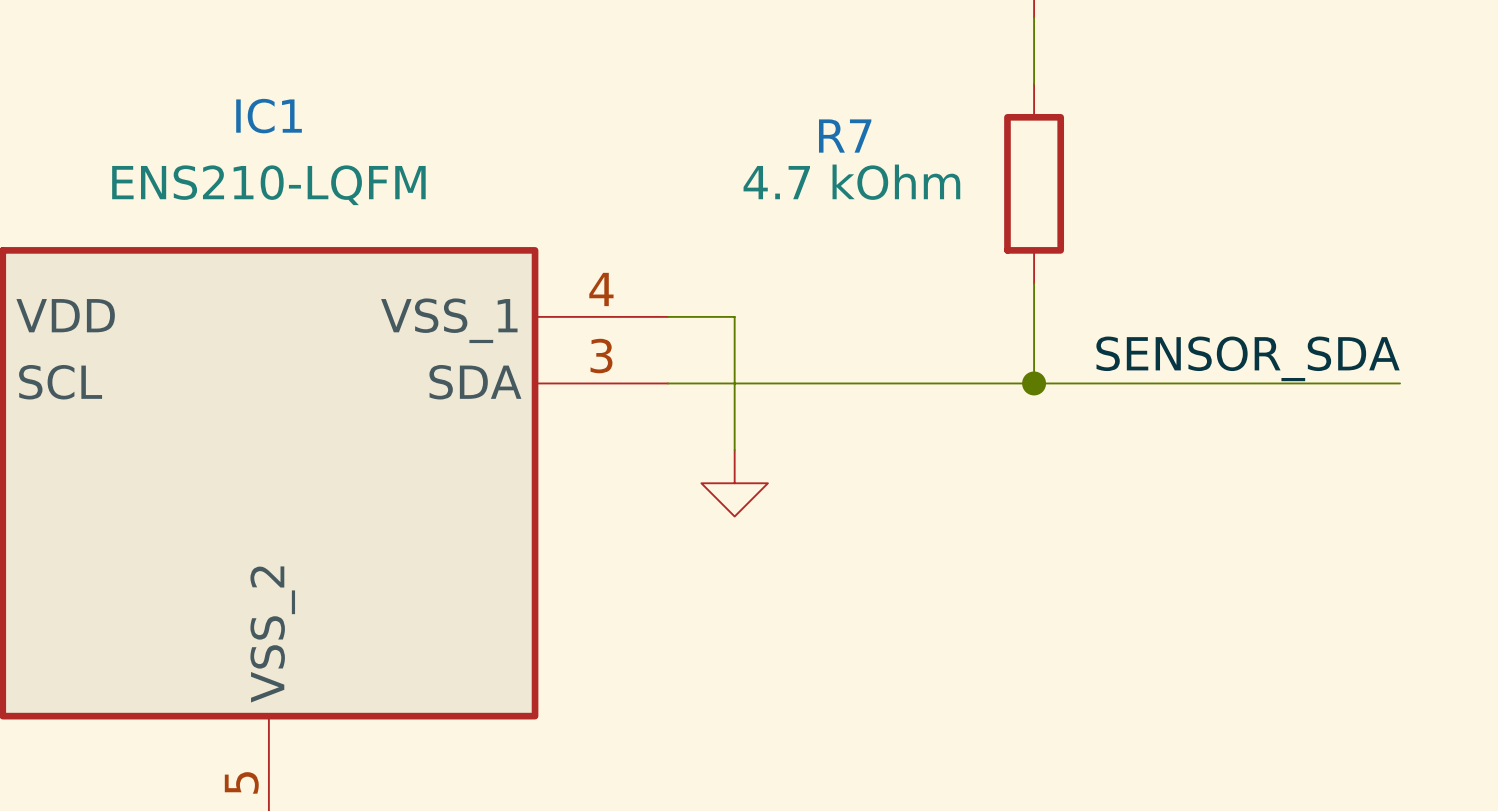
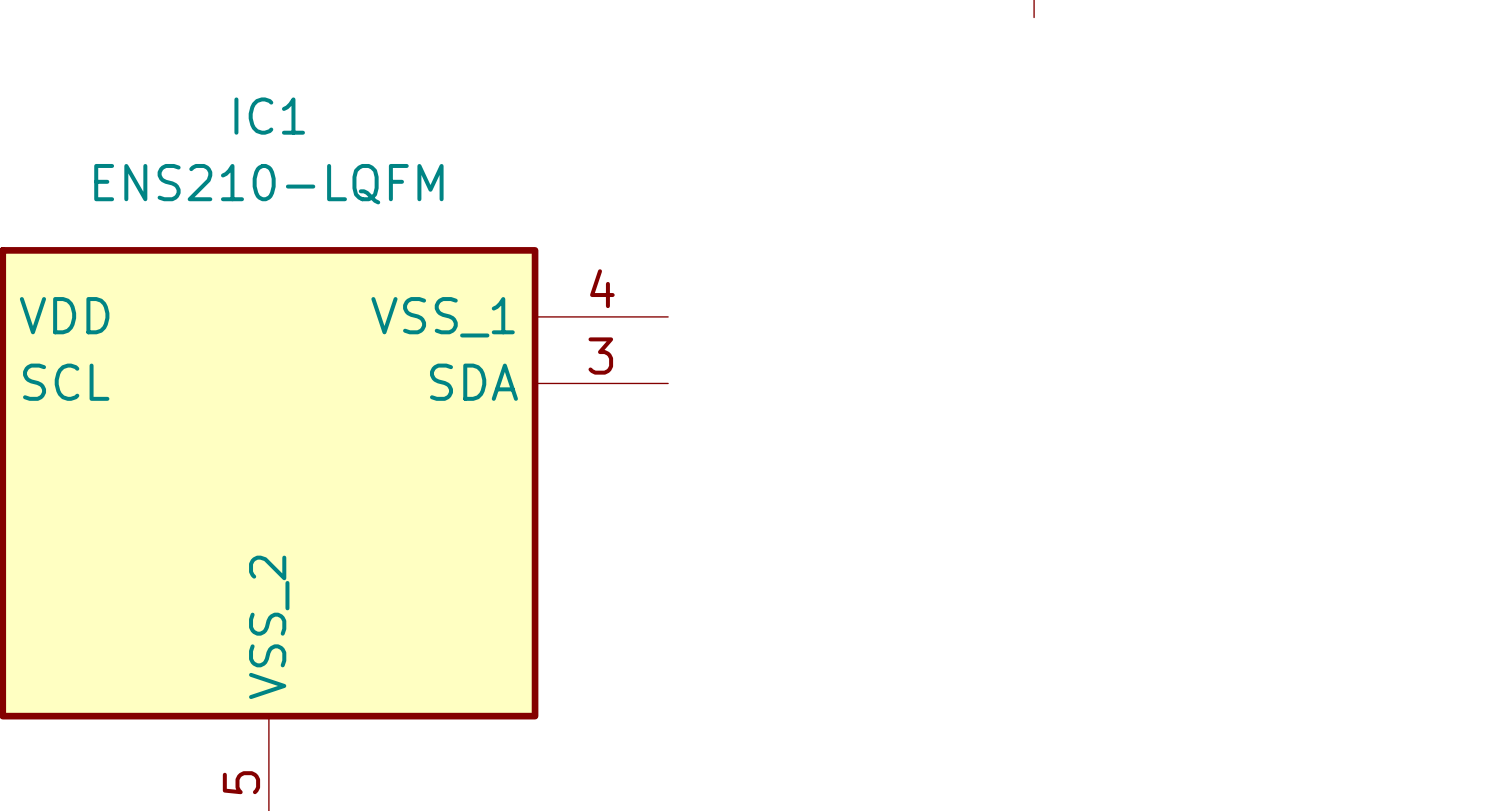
wire: (1034, 17) (1034, 84) -> none
R7: 4.7 kOhm (1034, 183) -> none
wire: (1034, 283) (1034, 383) -> none
wire: (668, 316) (734, 316) (734, 449) -> none
label: SENSOR_SDA (1248, 358) -> none
wire: (668, 383) (1400, 383) -> none
junction: (1034, 383) -> none
power symbol: (734, 483) -> none

